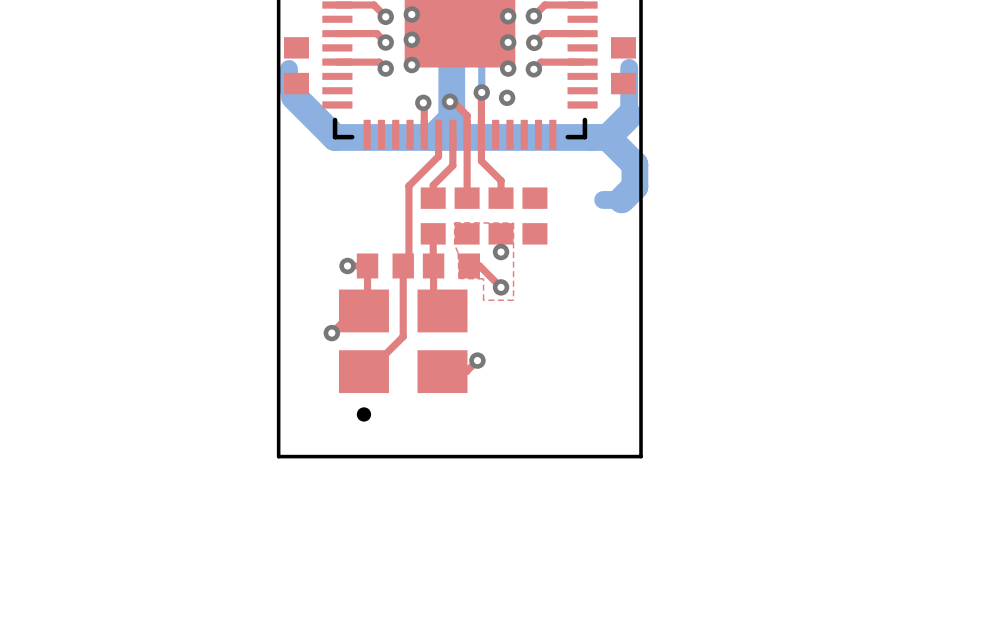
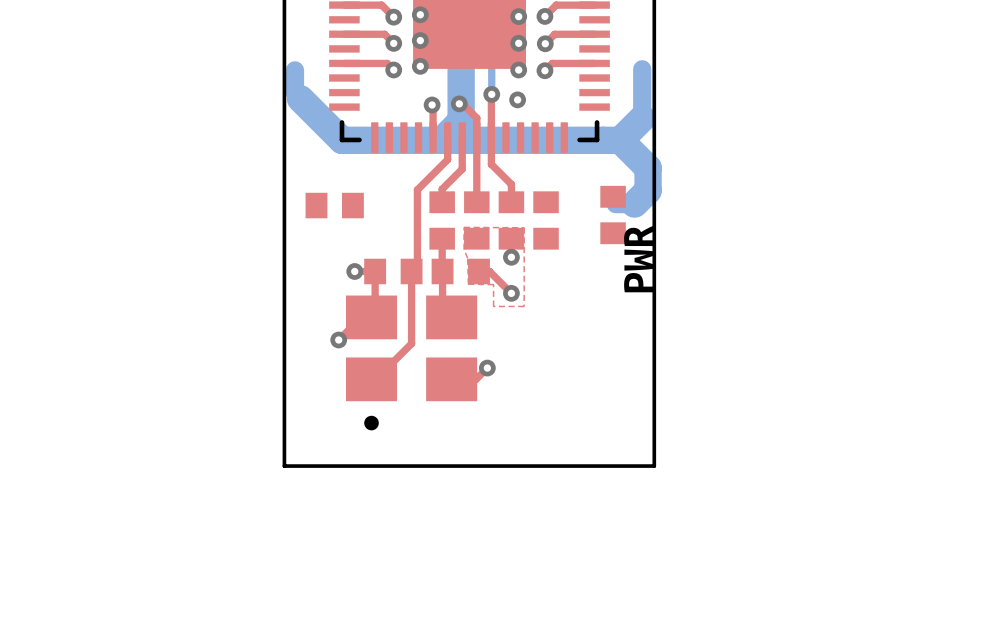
part rotation: 0° (296, 65) -> 90° clockwise (334, 205)
part position: (296, 65) -> (334, 205)
part position: (623, 65) -> (613, 215)
drawing: none -> [624, 225, 654, 293]

